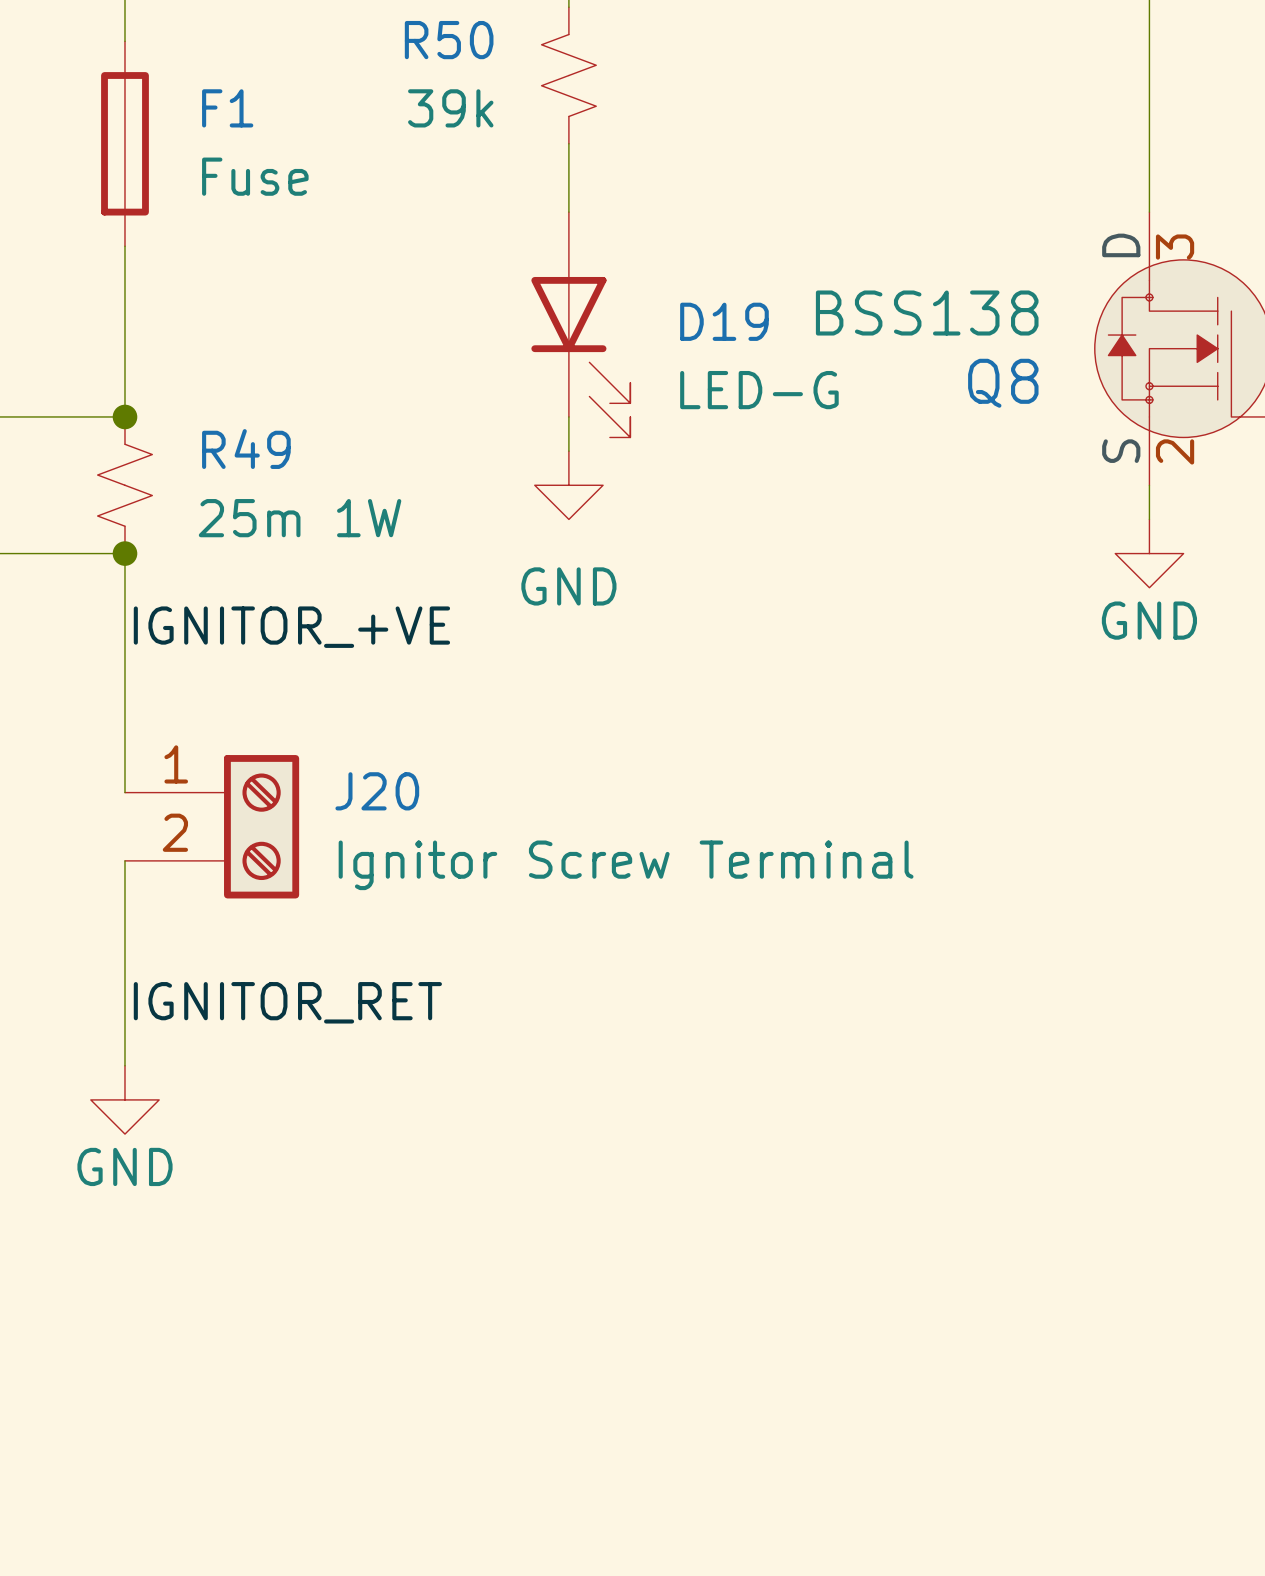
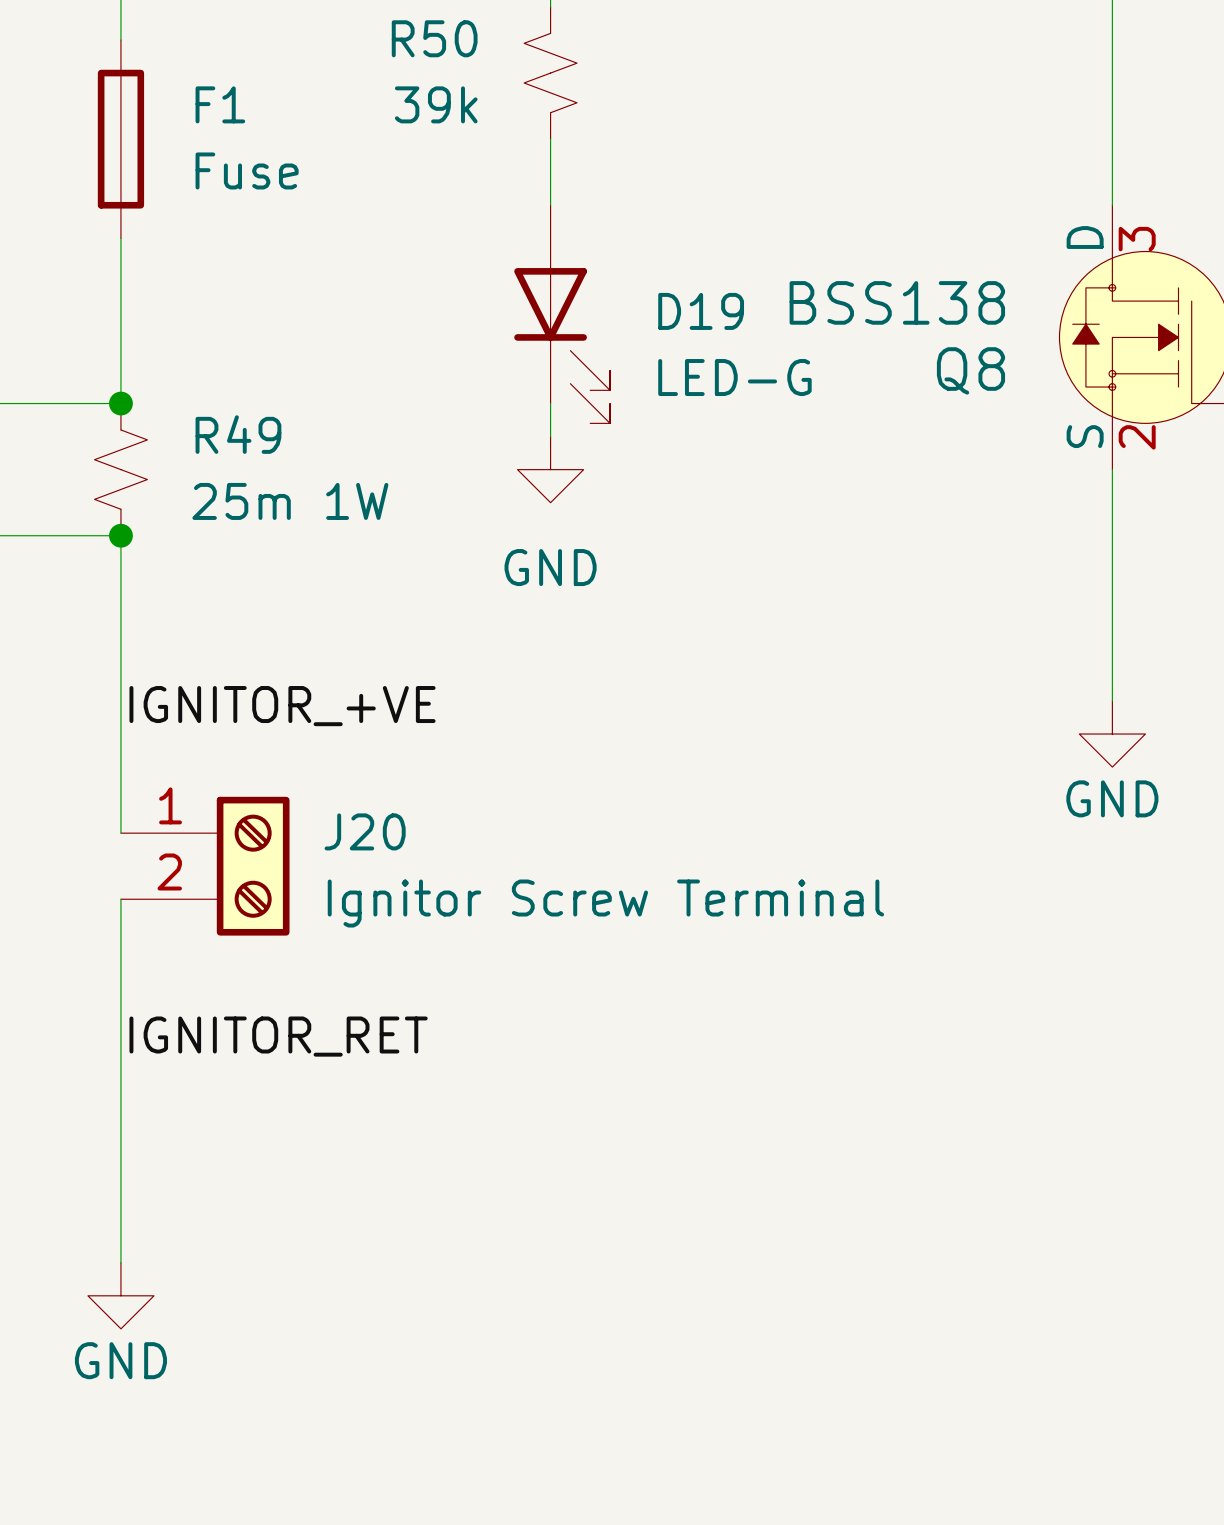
wire: none -> (1112, 502) (1112, 700)
power symbol position: GND (1149, 553) -> GND (1112, 734)
label position: IGNITOR_+VE (291, 627) -> IGNITOR_+VE (282, 706)
J20 position: (212, 826) -> (205, 866)
wire: (124, 860) (124, 929) -> (120, 833) (120, 767)
label position: IGNITOR_RET (287, 1002) -> IGNITOR_RET (278, 1036)
wire: none -> (120, 1031) (120, 1262)
power symbol position: GND (124, 1099) -> GND (120, 1295)

